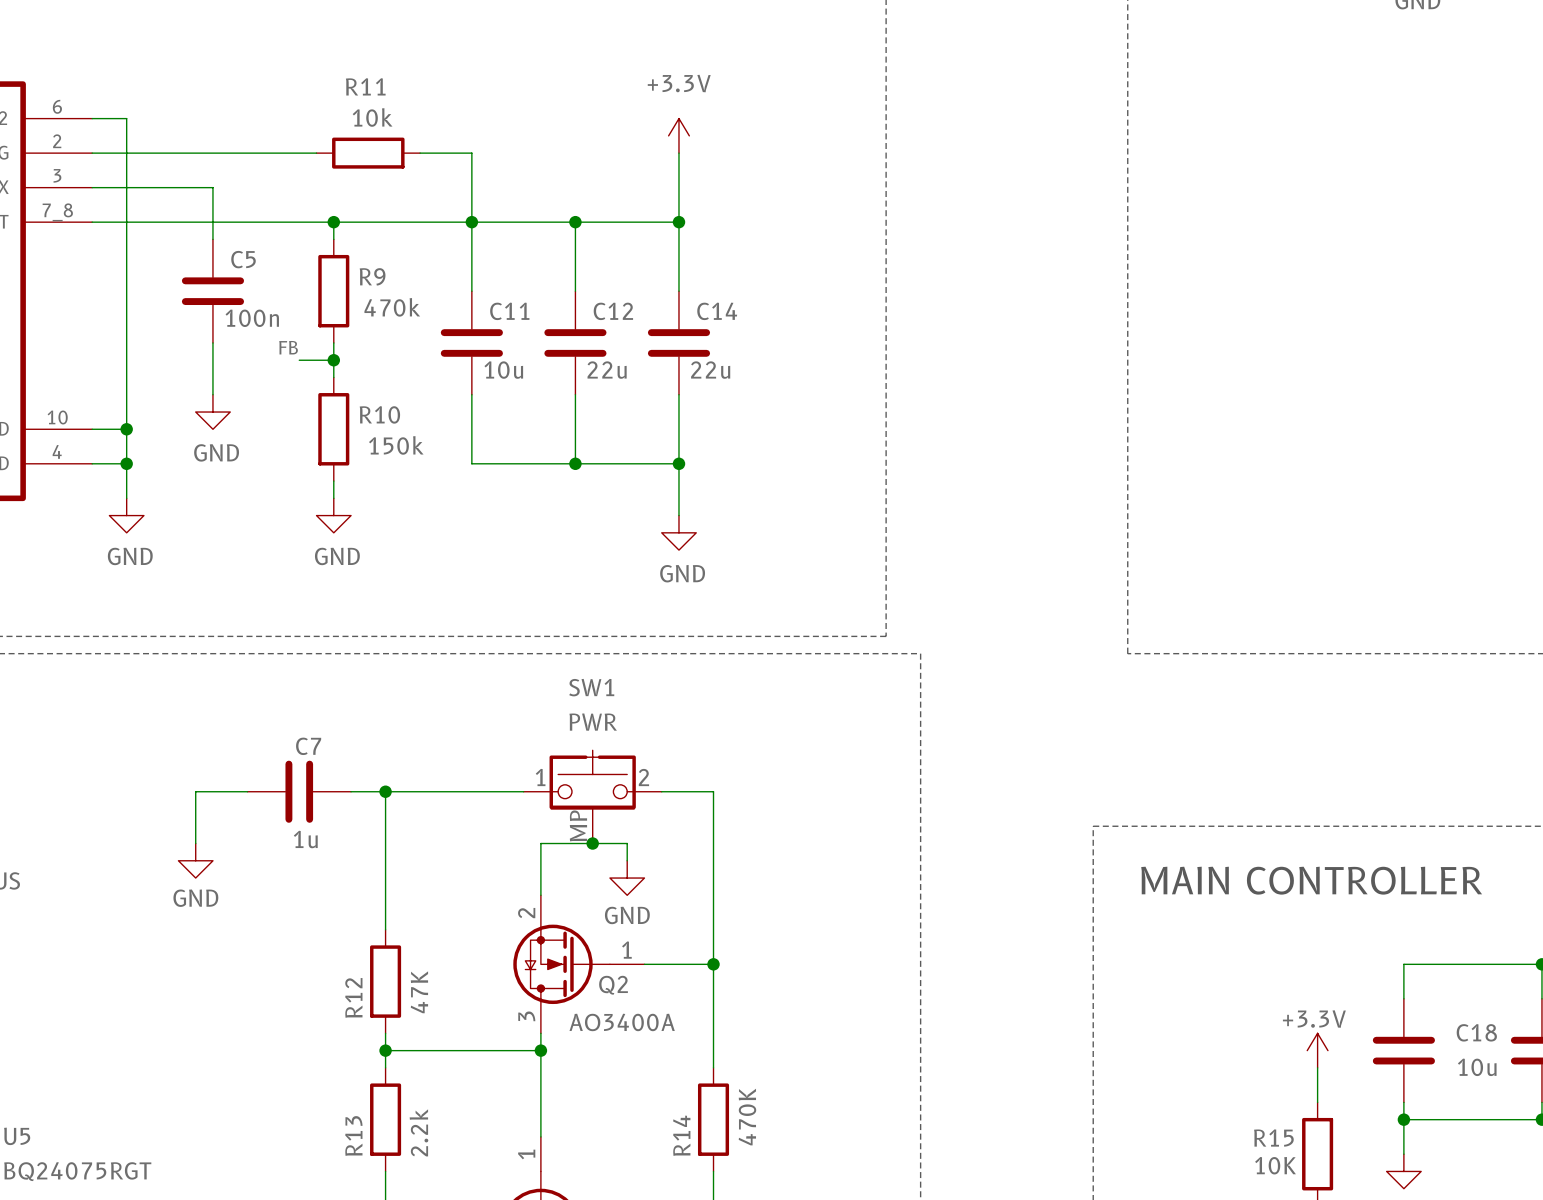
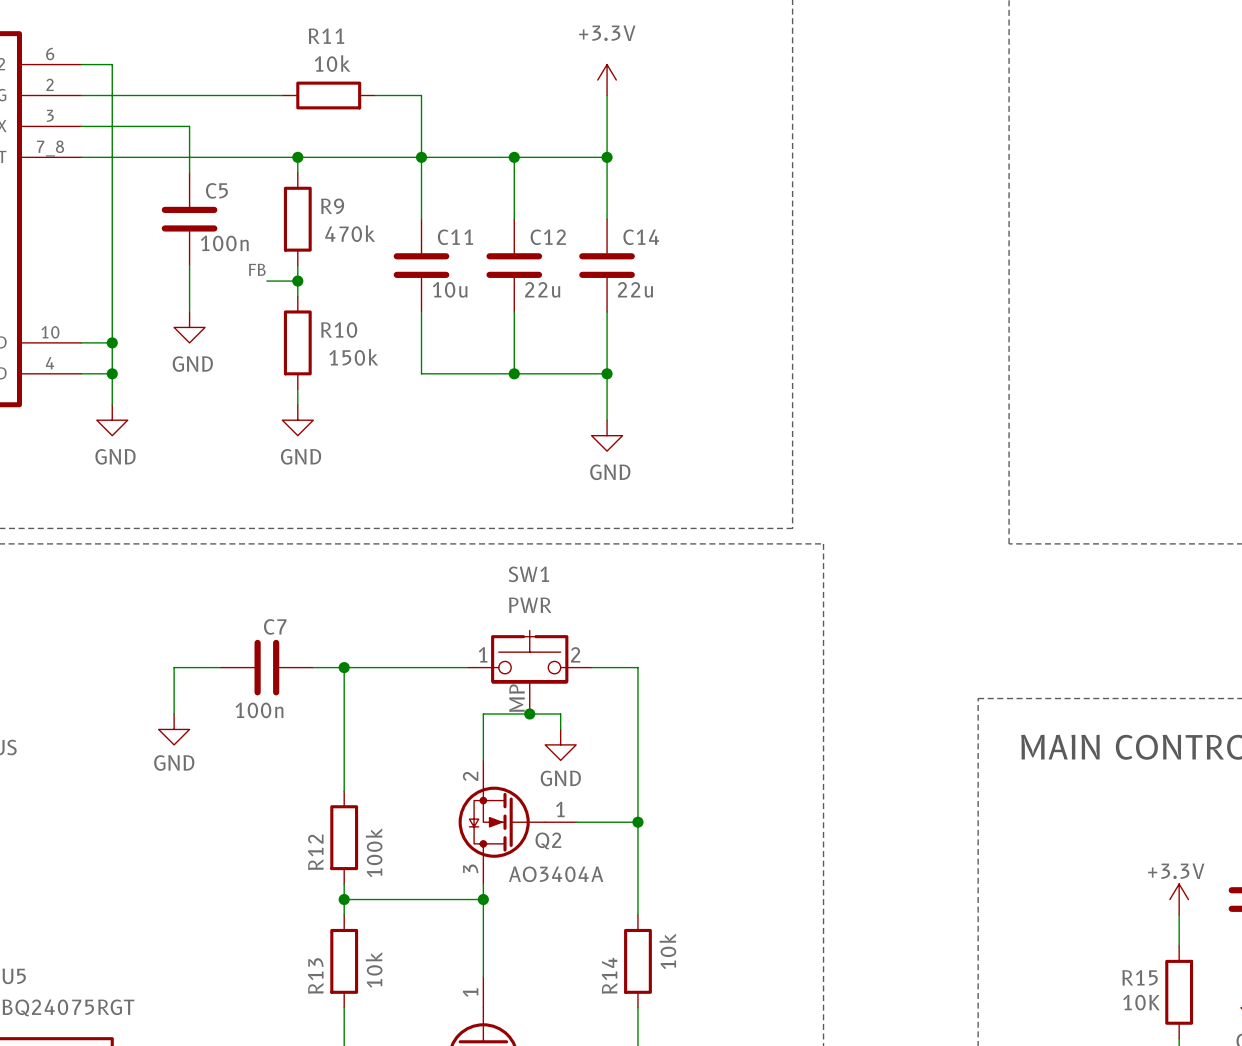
C7 value: 1u (305, 839) -> 100n (259, 710)
R12 value: 47K (419, 992) -> 100k (374, 852)
Q2 value: AO3400A (622, 1022) -> AO3404A (556, 874)
R14 value: 470K (747, 1117) -> 10k (667, 951)
R13 value: 2.2k (418, 1132) -> 10k (374, 969)

